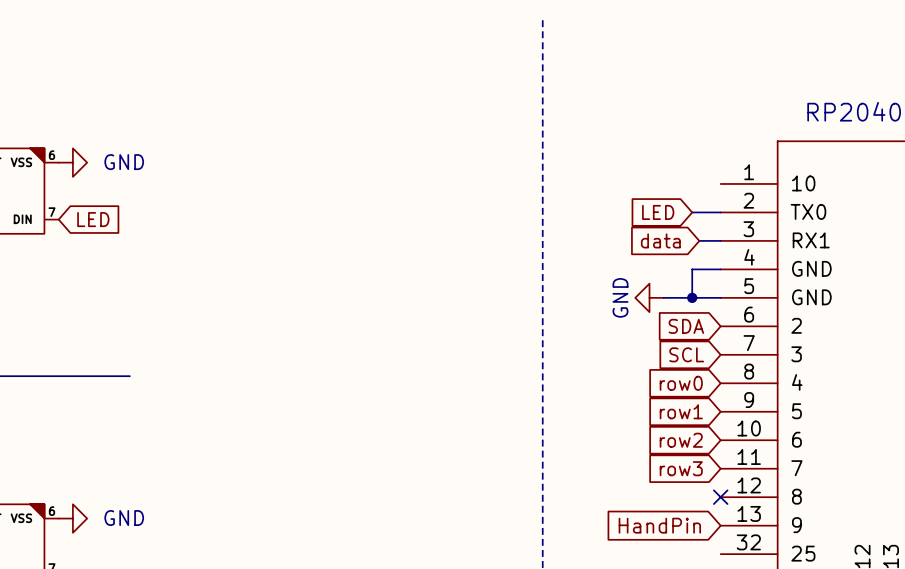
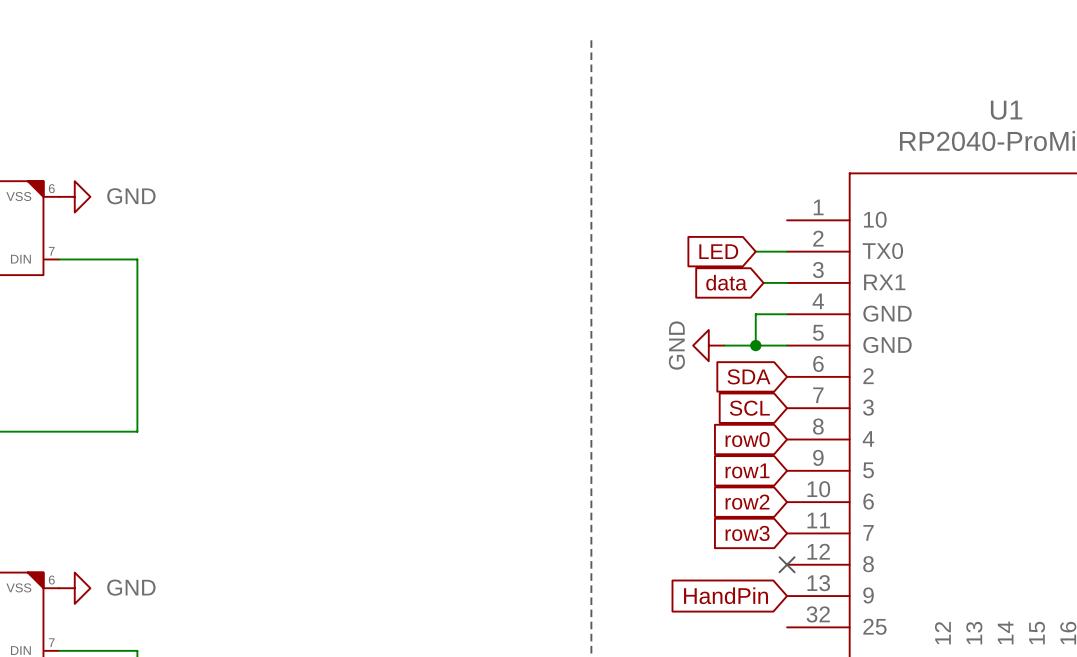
wire: none -> (59, 259) (137, 259) (137, 431)
global label: LED (93, 219) -> none

